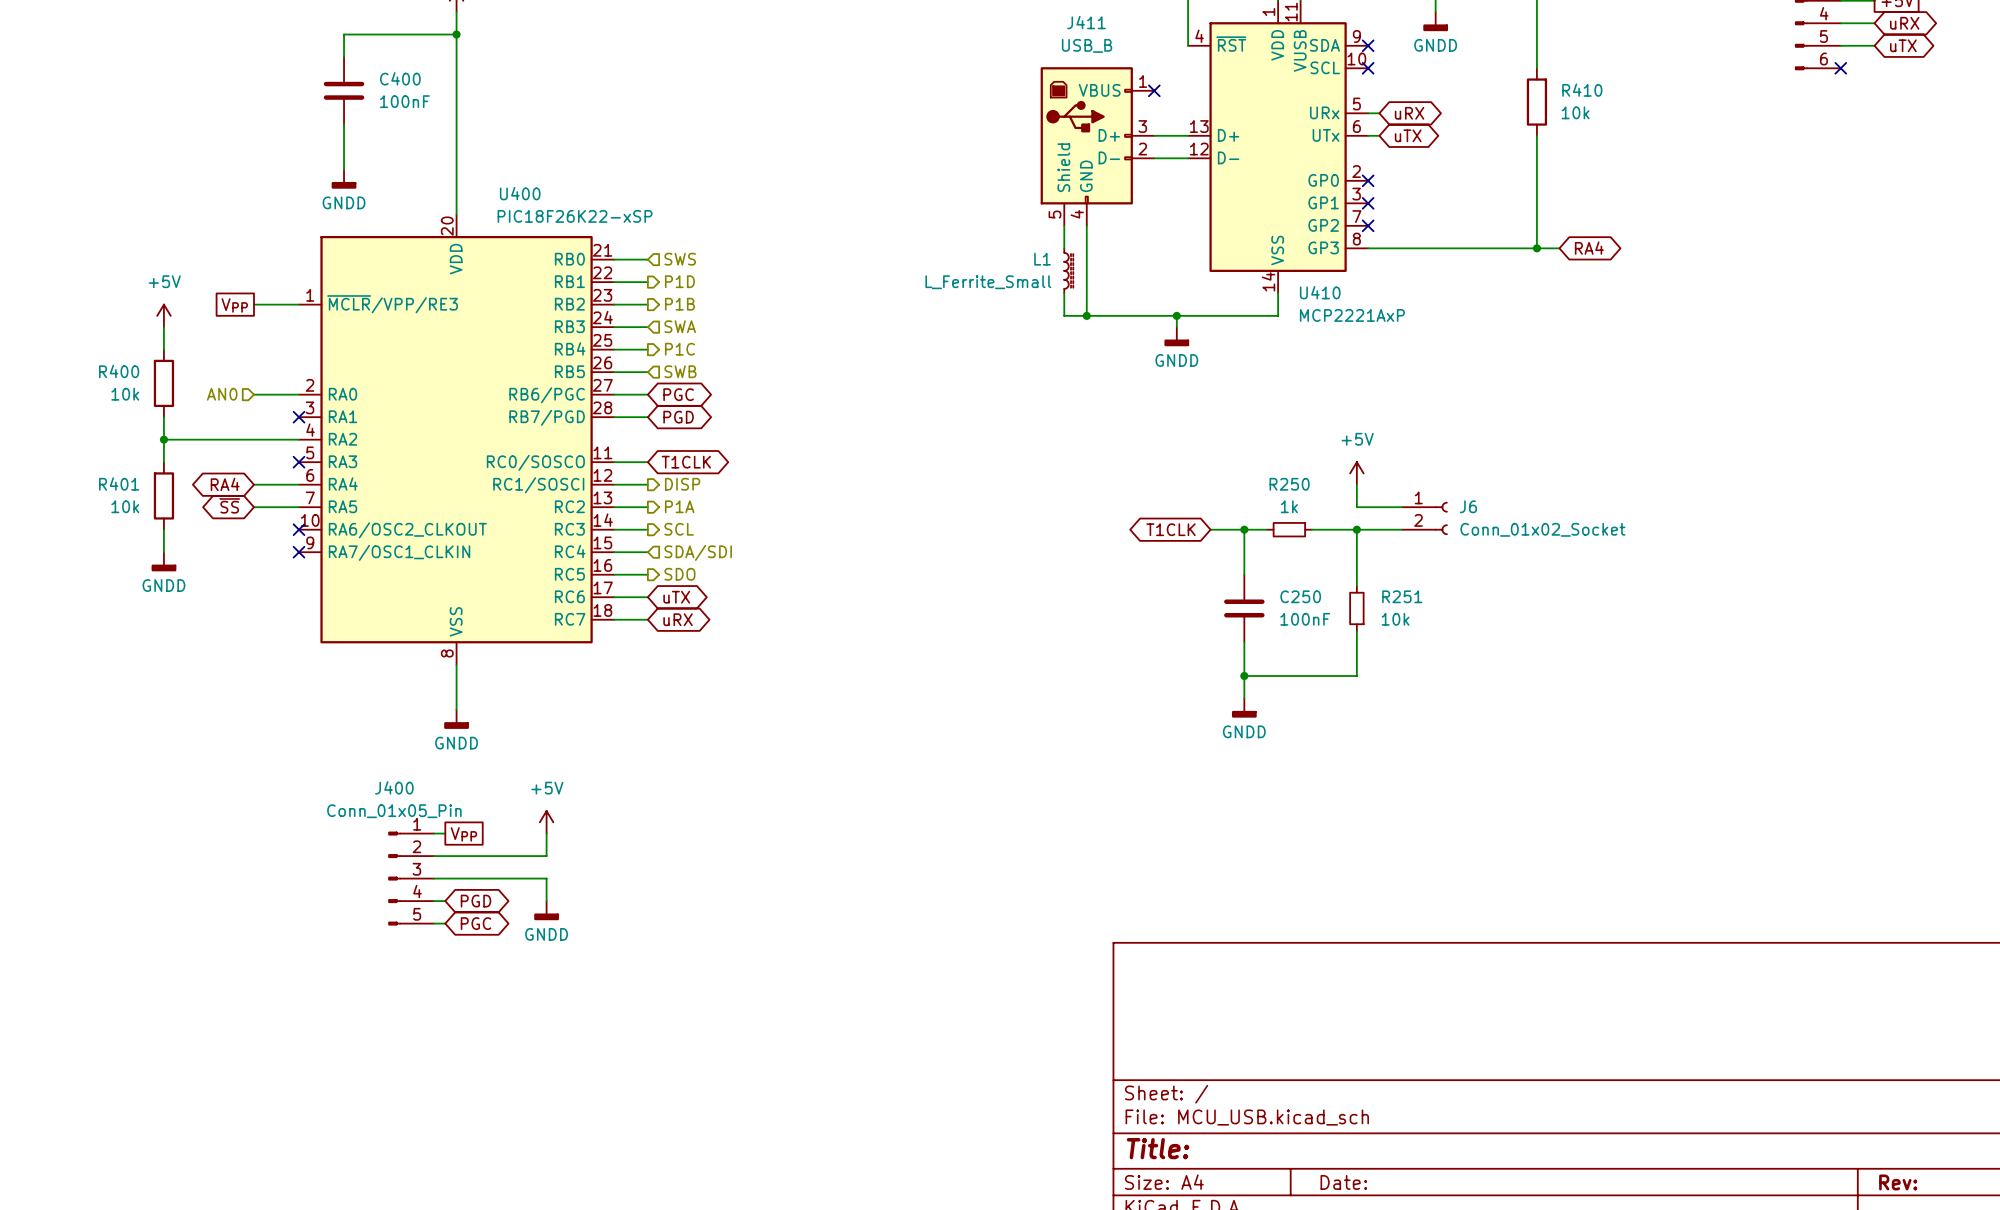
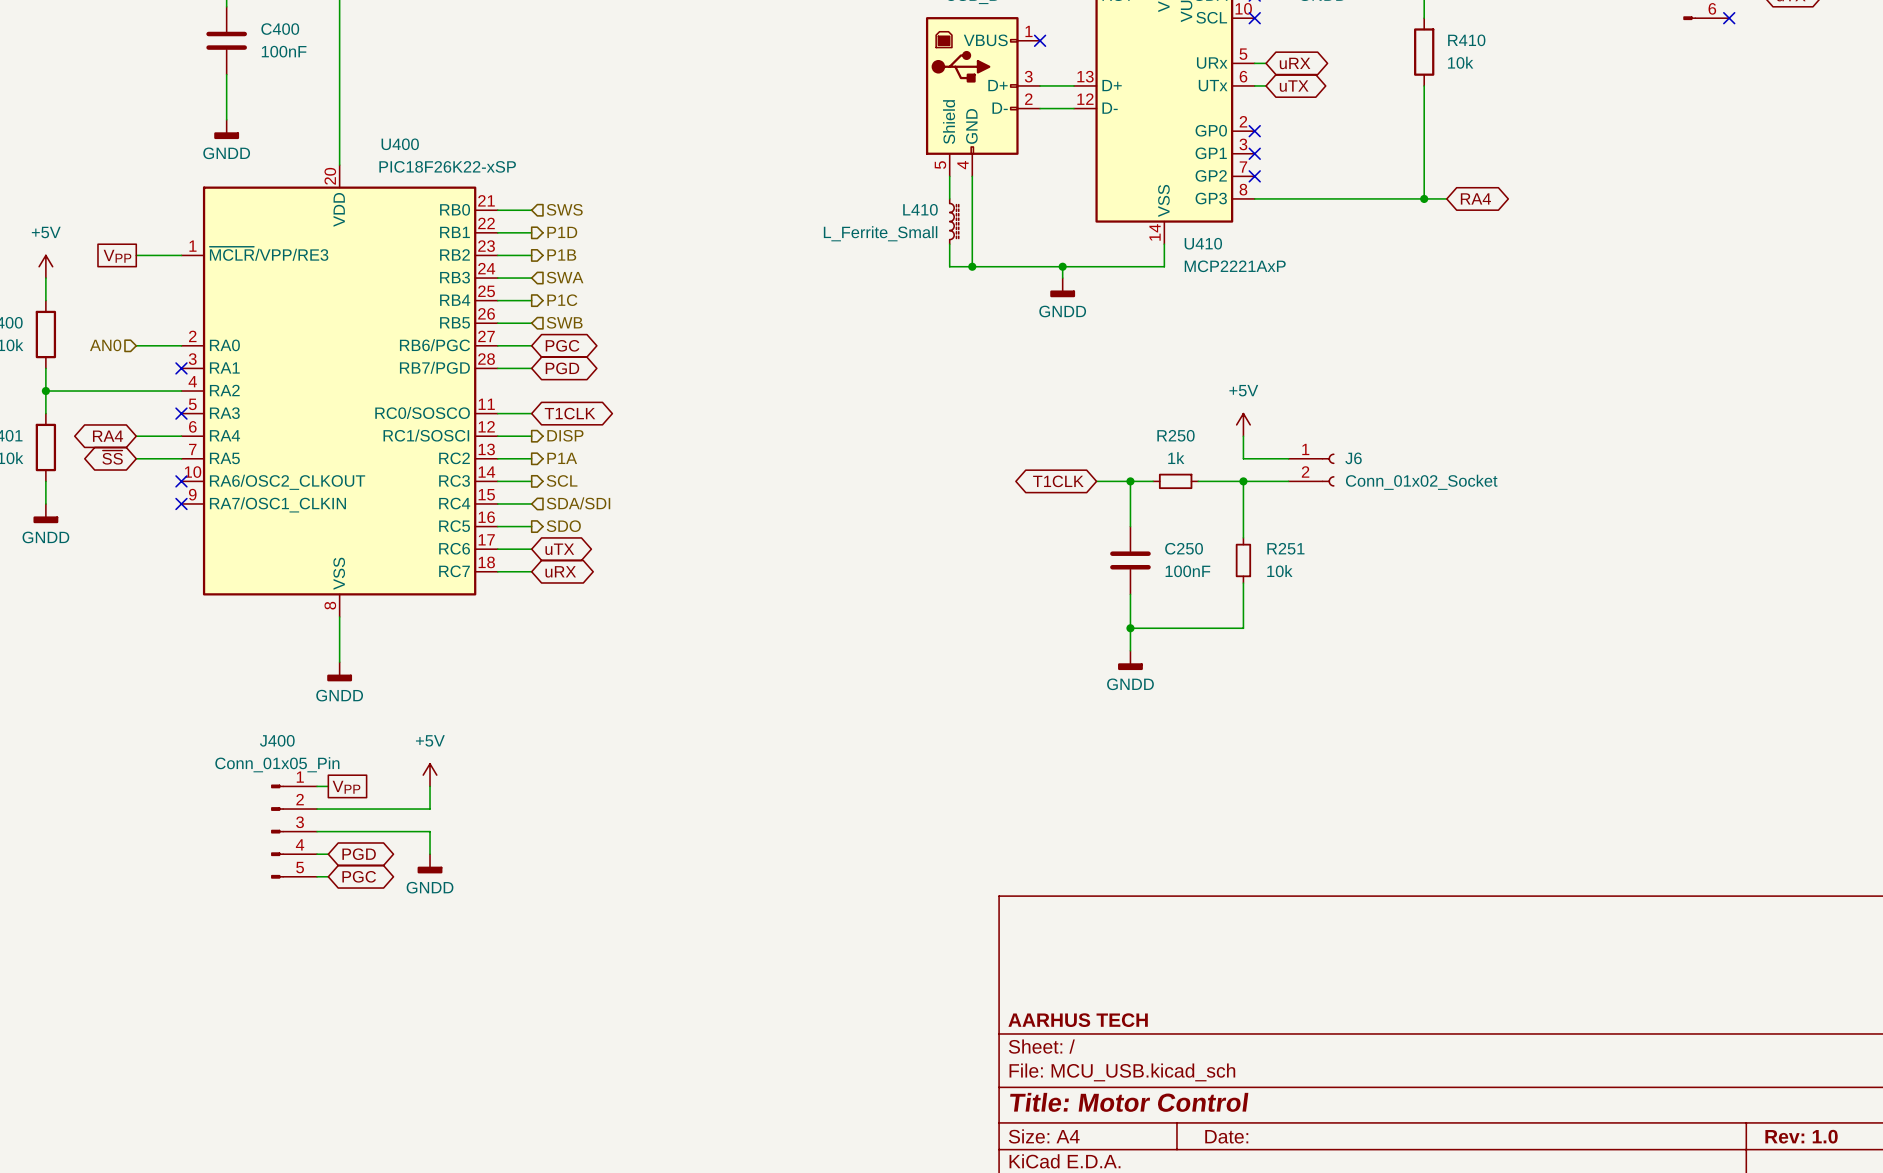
L1 name: L1 (1042, 259) -> L410 (920, 209)
title block: none -> AARHUS TECH (1078, 1020)
title block: Title: (1158, 1148) -> Title: Motor Control (1129, 1102)
title block: Rev: (1898, 1182) -> Rev: 1.0 (1801, 1136)

